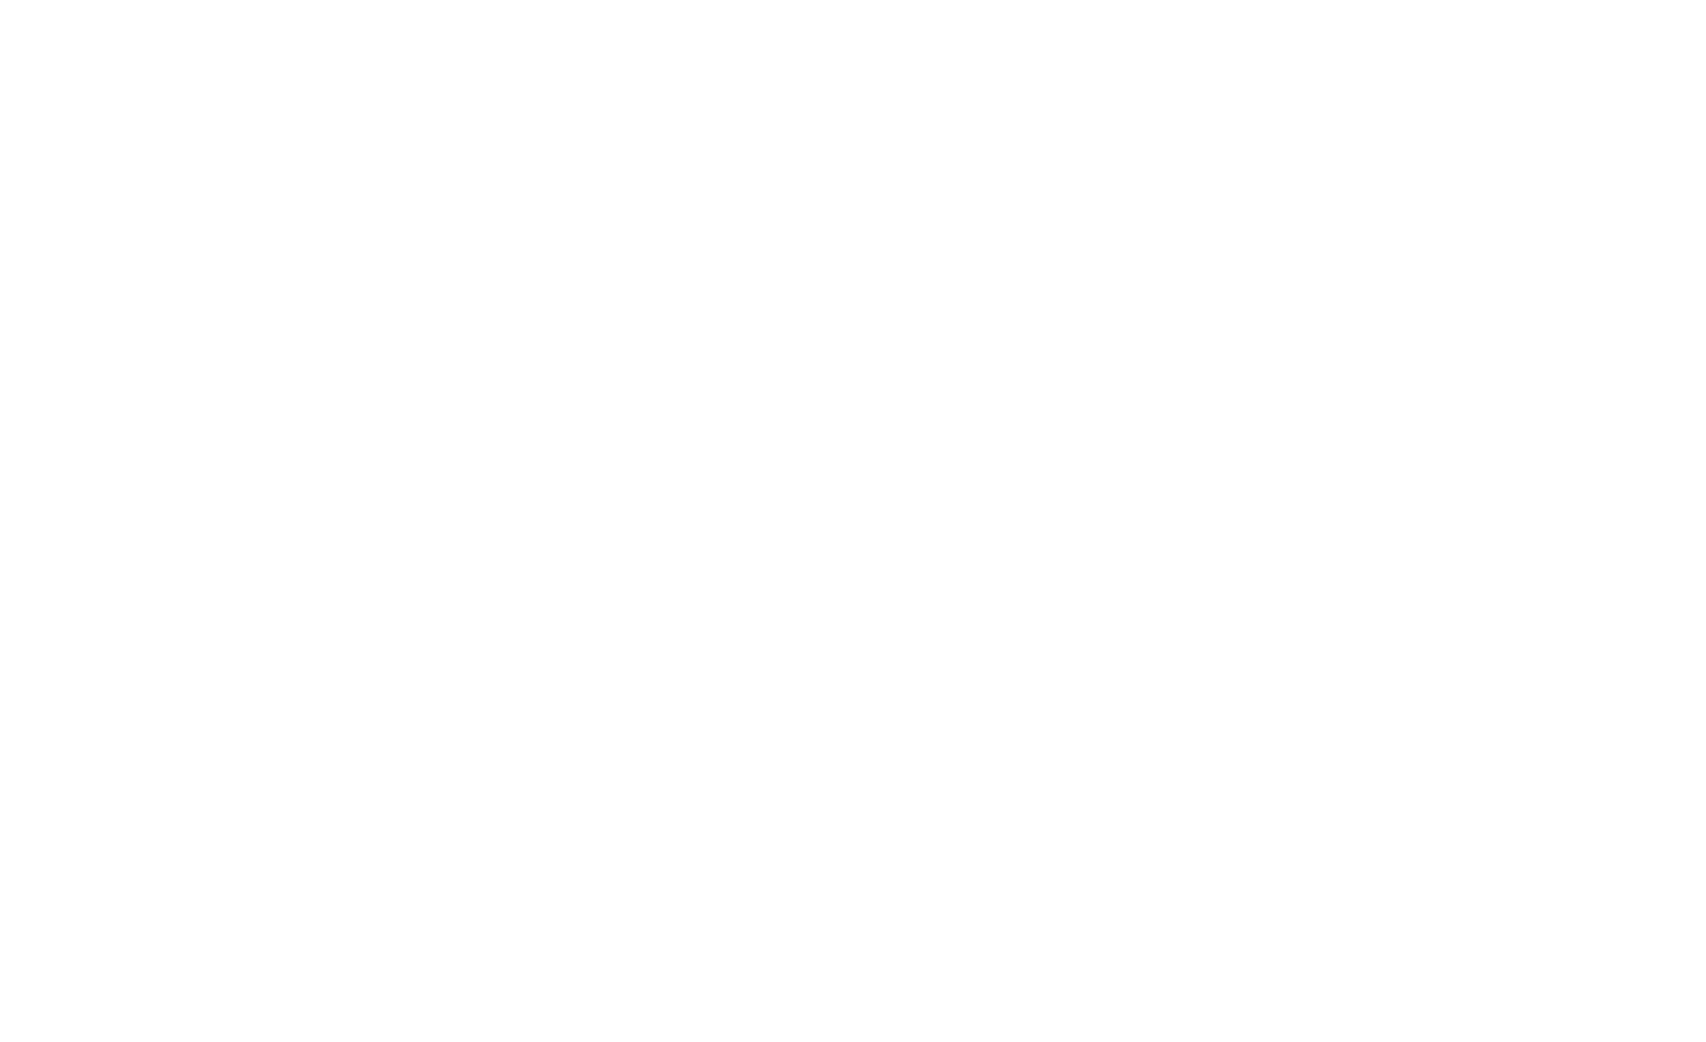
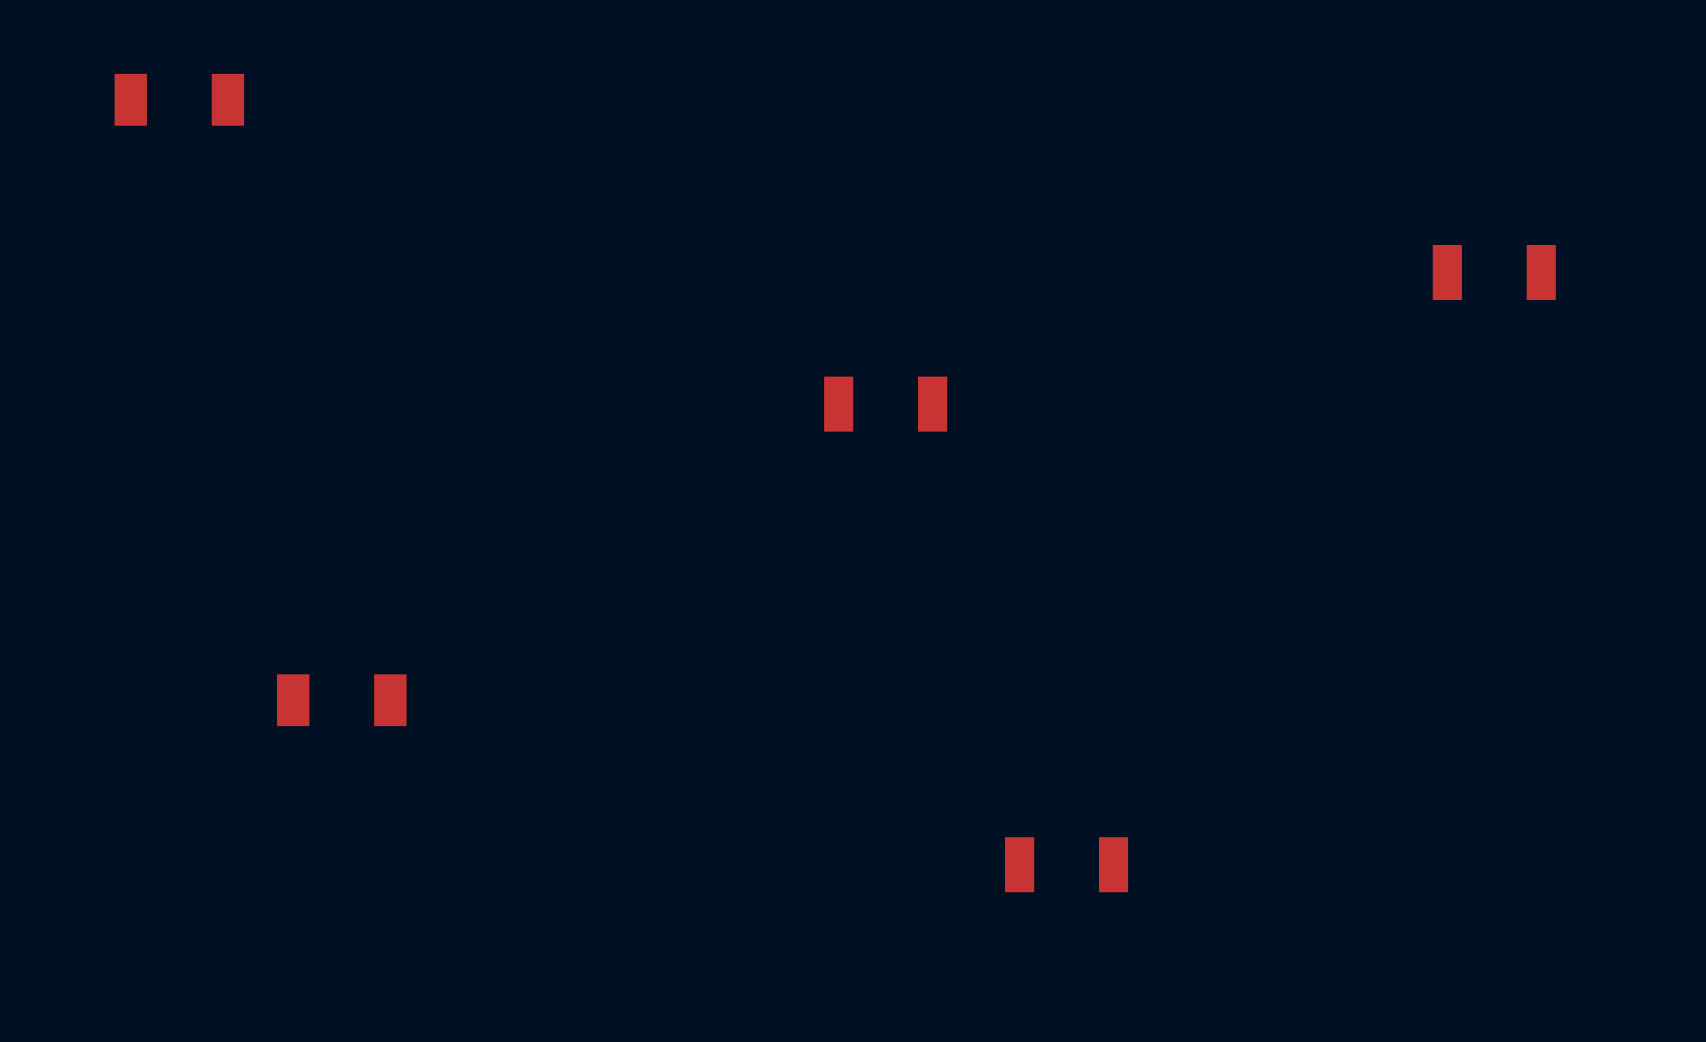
part: none -> (179, 99)
part: none -> (1494, 272)
part: none -> (885, 404)
part: none -> (341, 700)
part: none -> (1066, 864)

